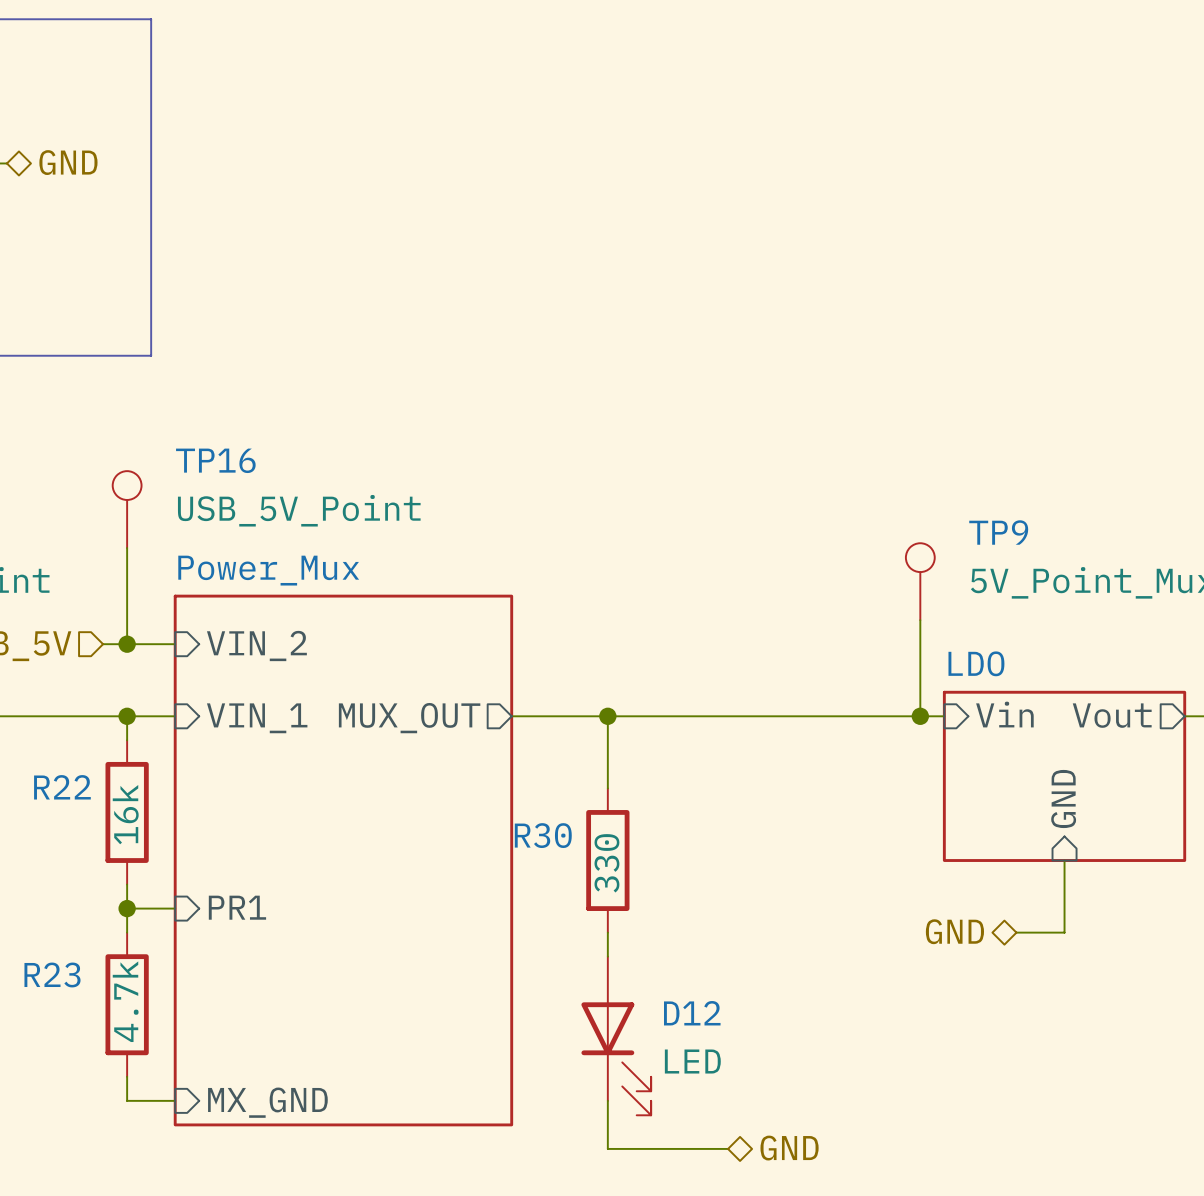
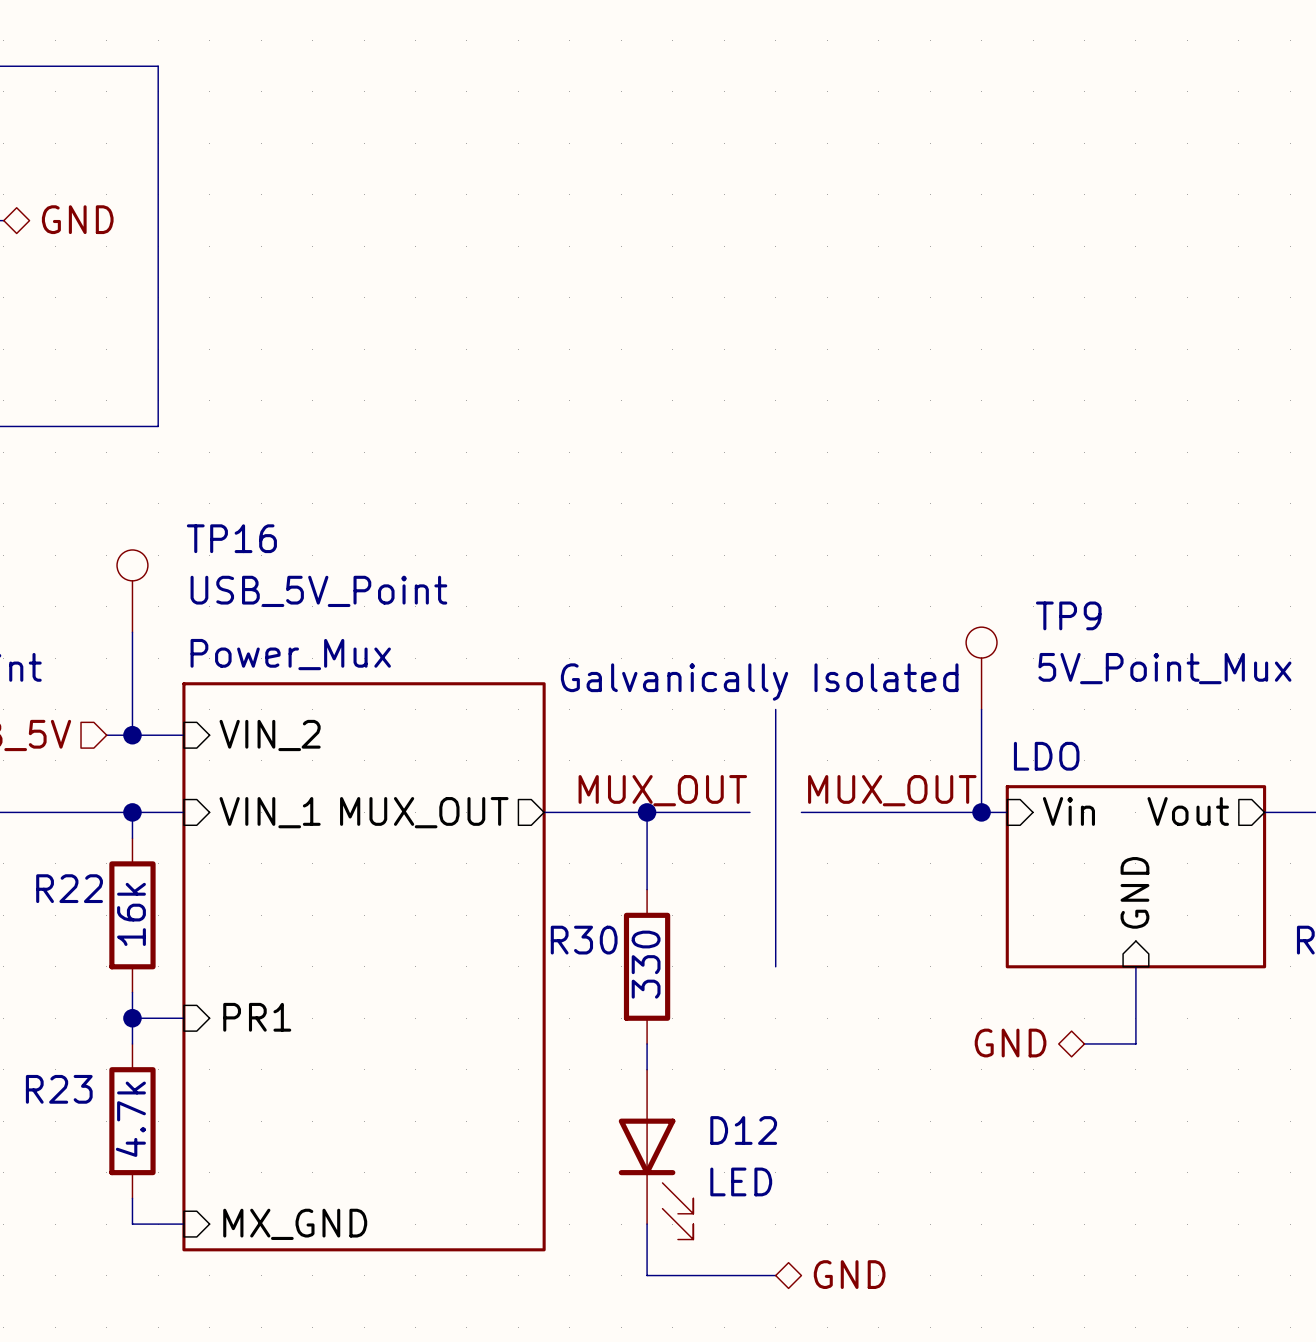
text: none -> Galvanically Isolated (759, 682)
line: none -> (775, 709) (775, 966)
label: none -> MUX_OUT (662, 790)
label: none -> MUX_OUT (892, 790)
wire: (703, 716) (752, 716) -> none

